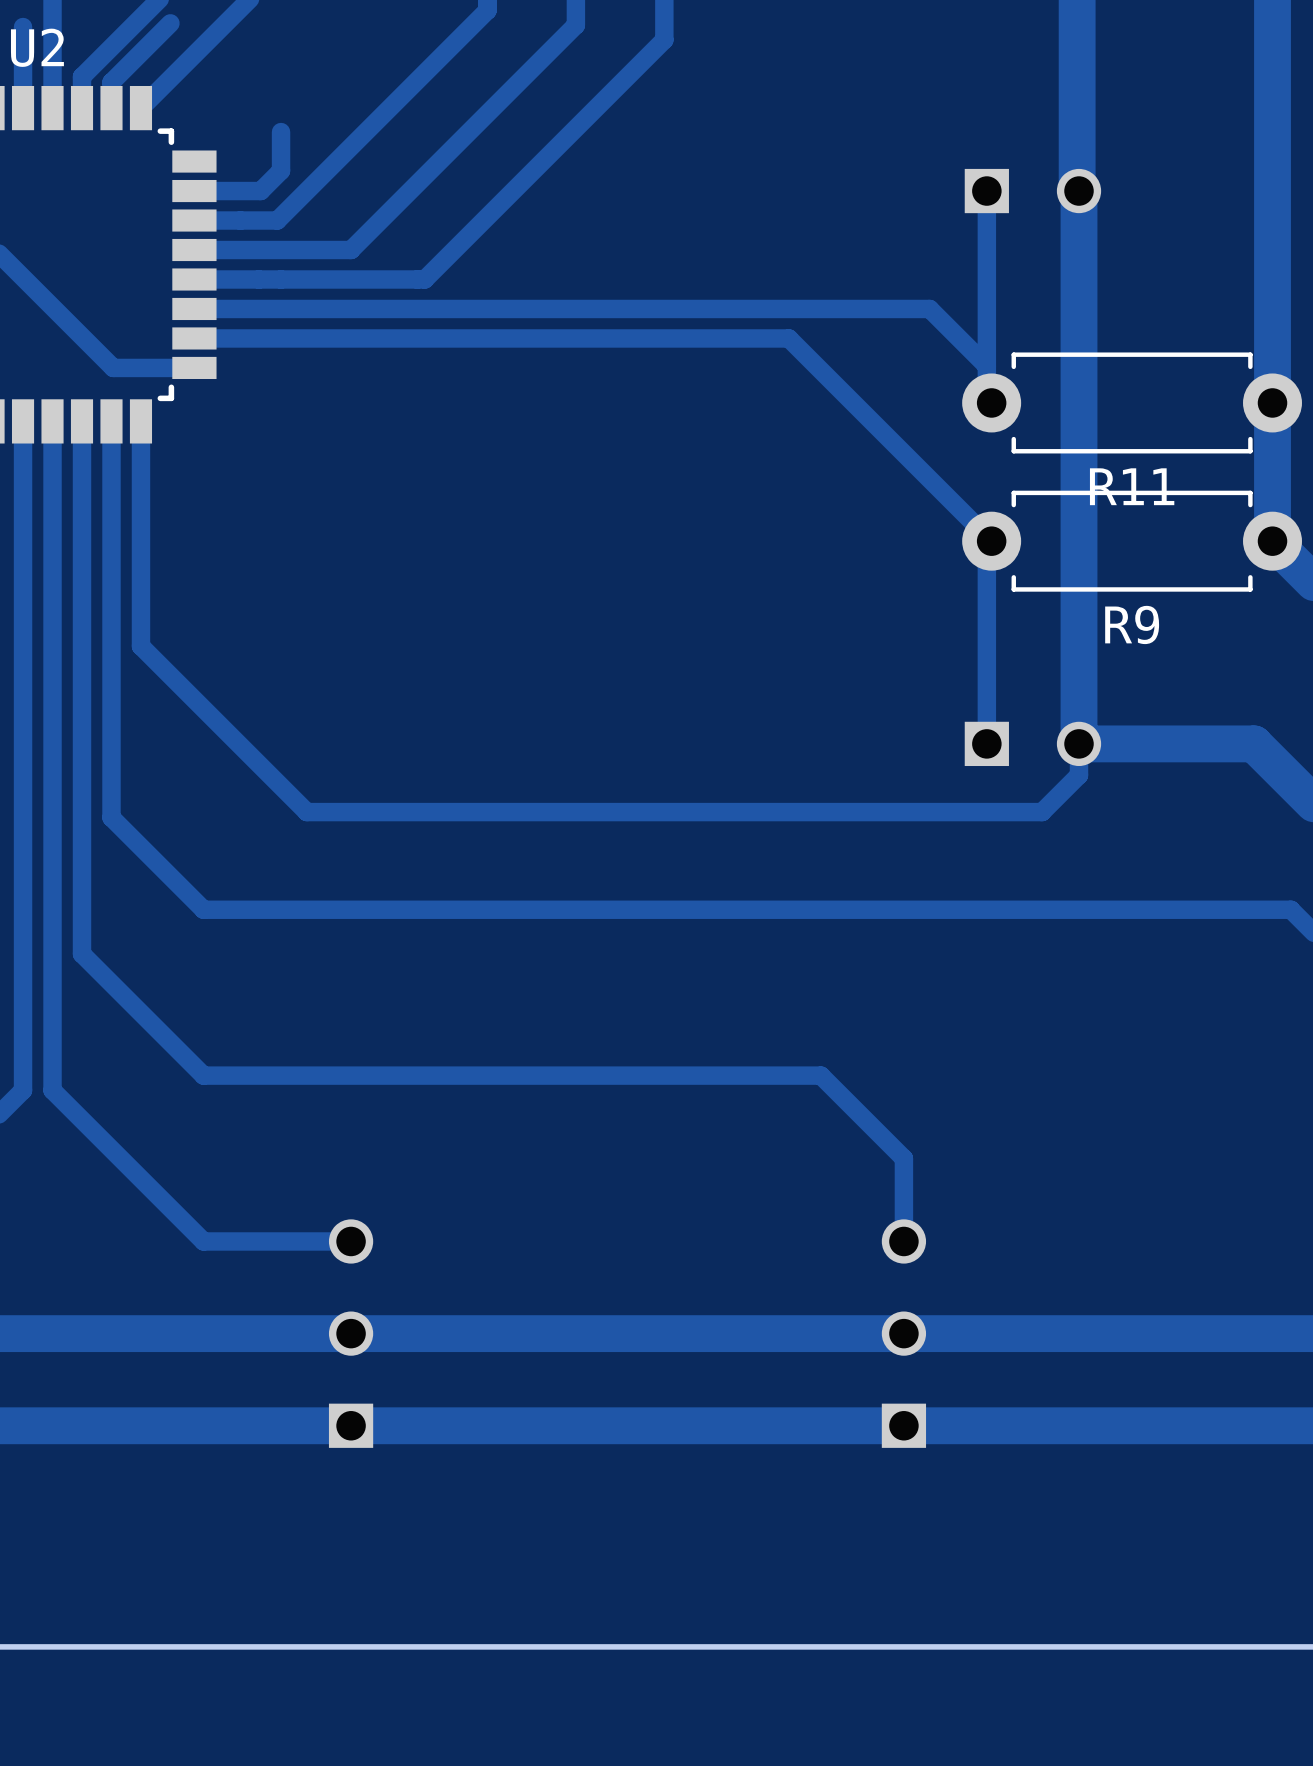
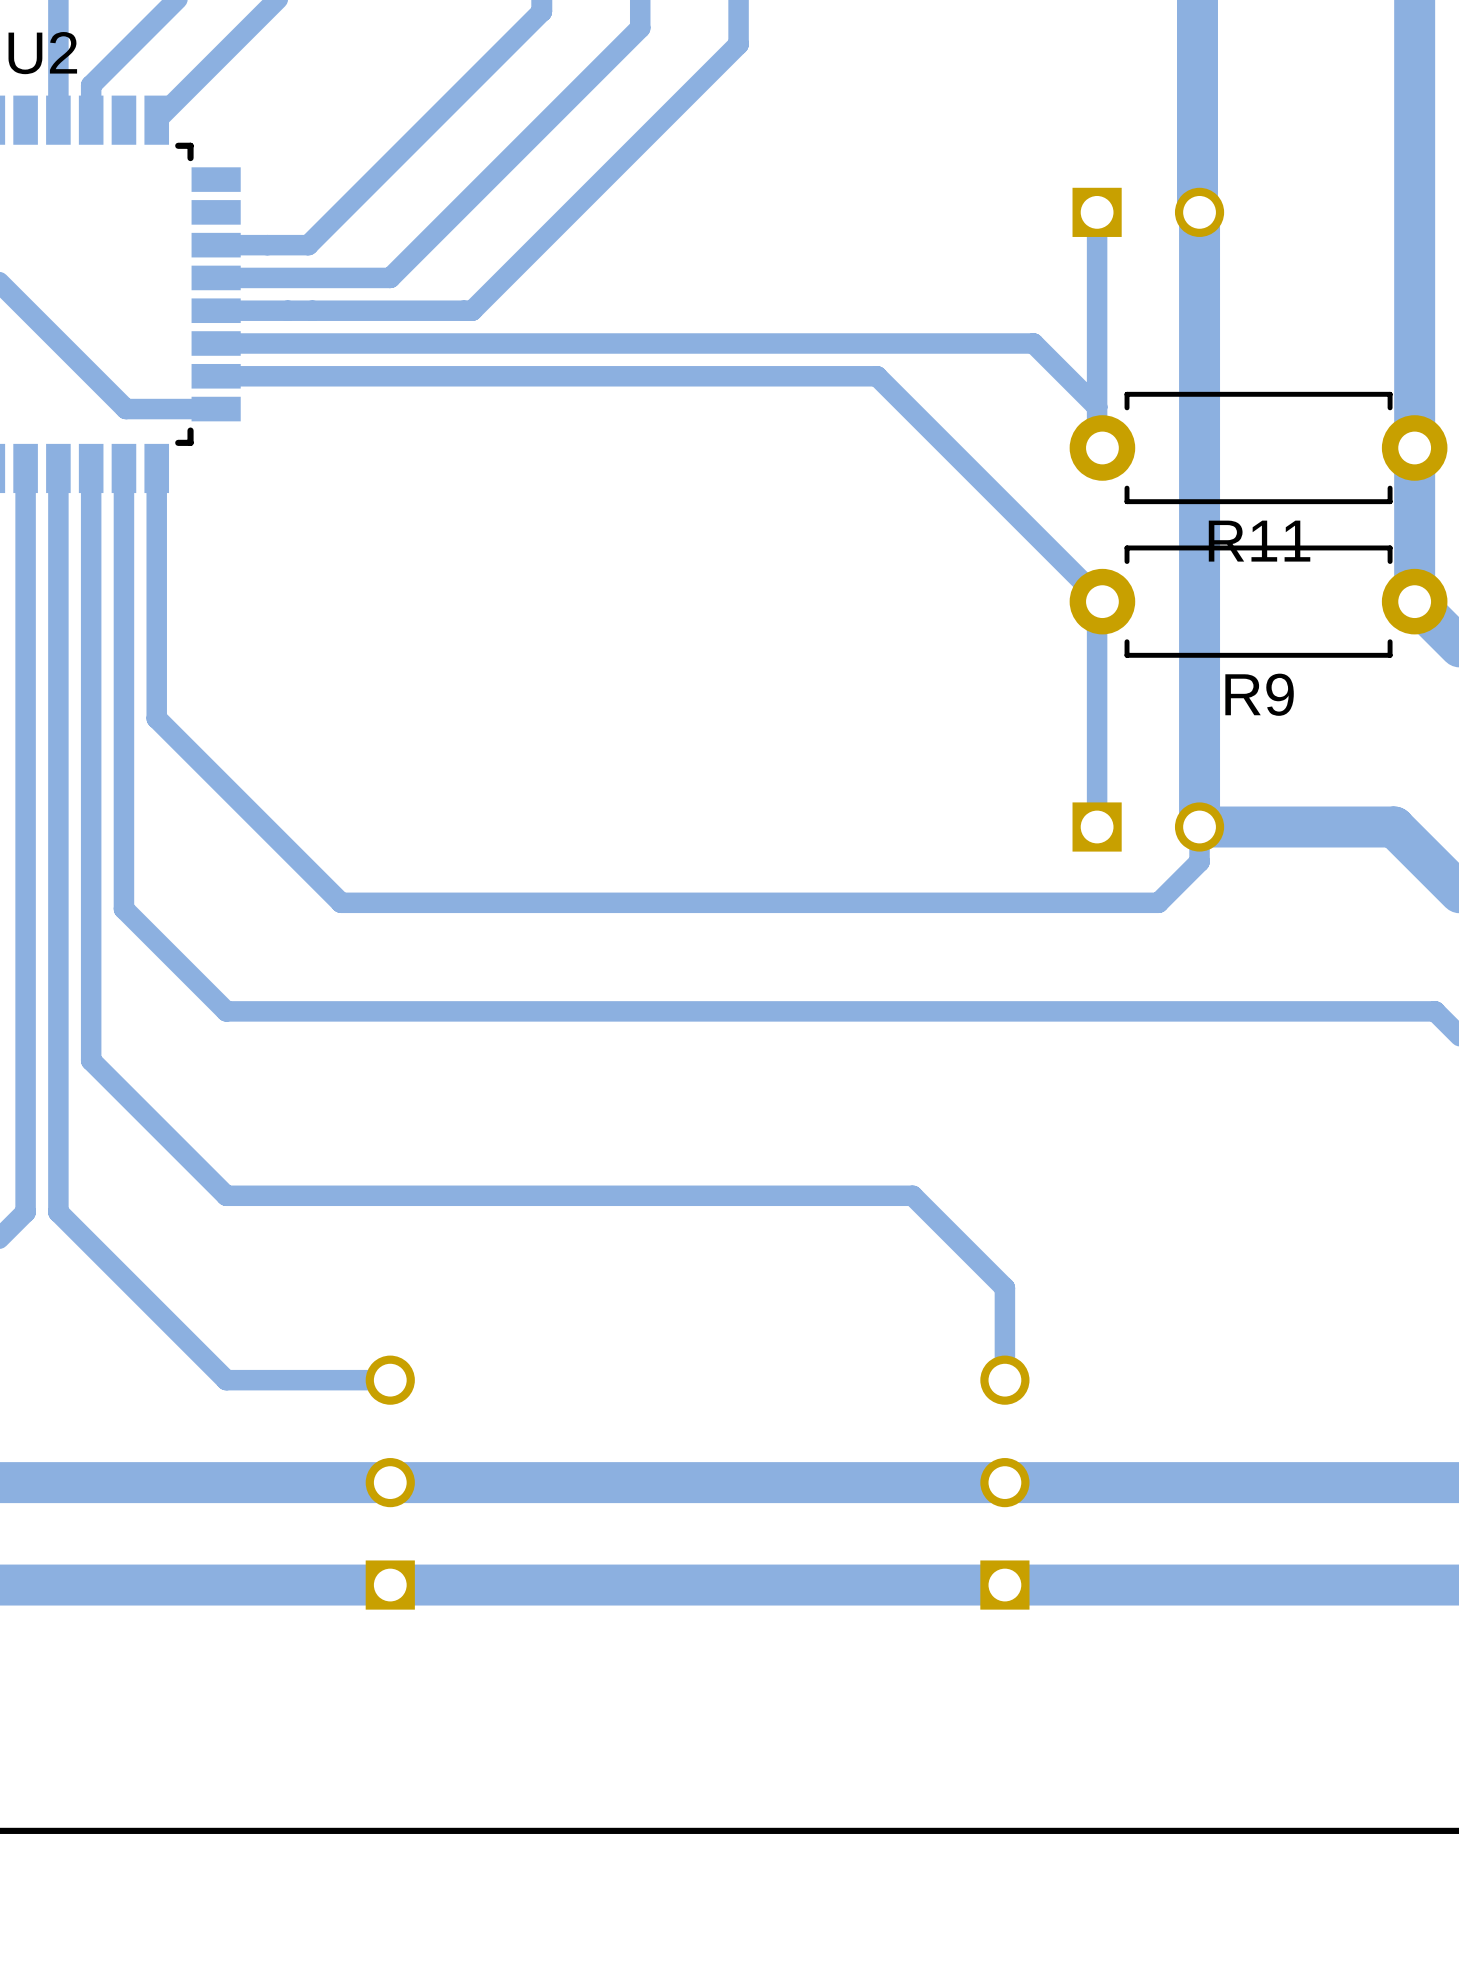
track: (170, 23) (111, 82) (111, 108) -> none
track: (23, 27) (23, 108) -> none
track: (281, 132) (281, 170) (260, 191) (194, 191) -> none

